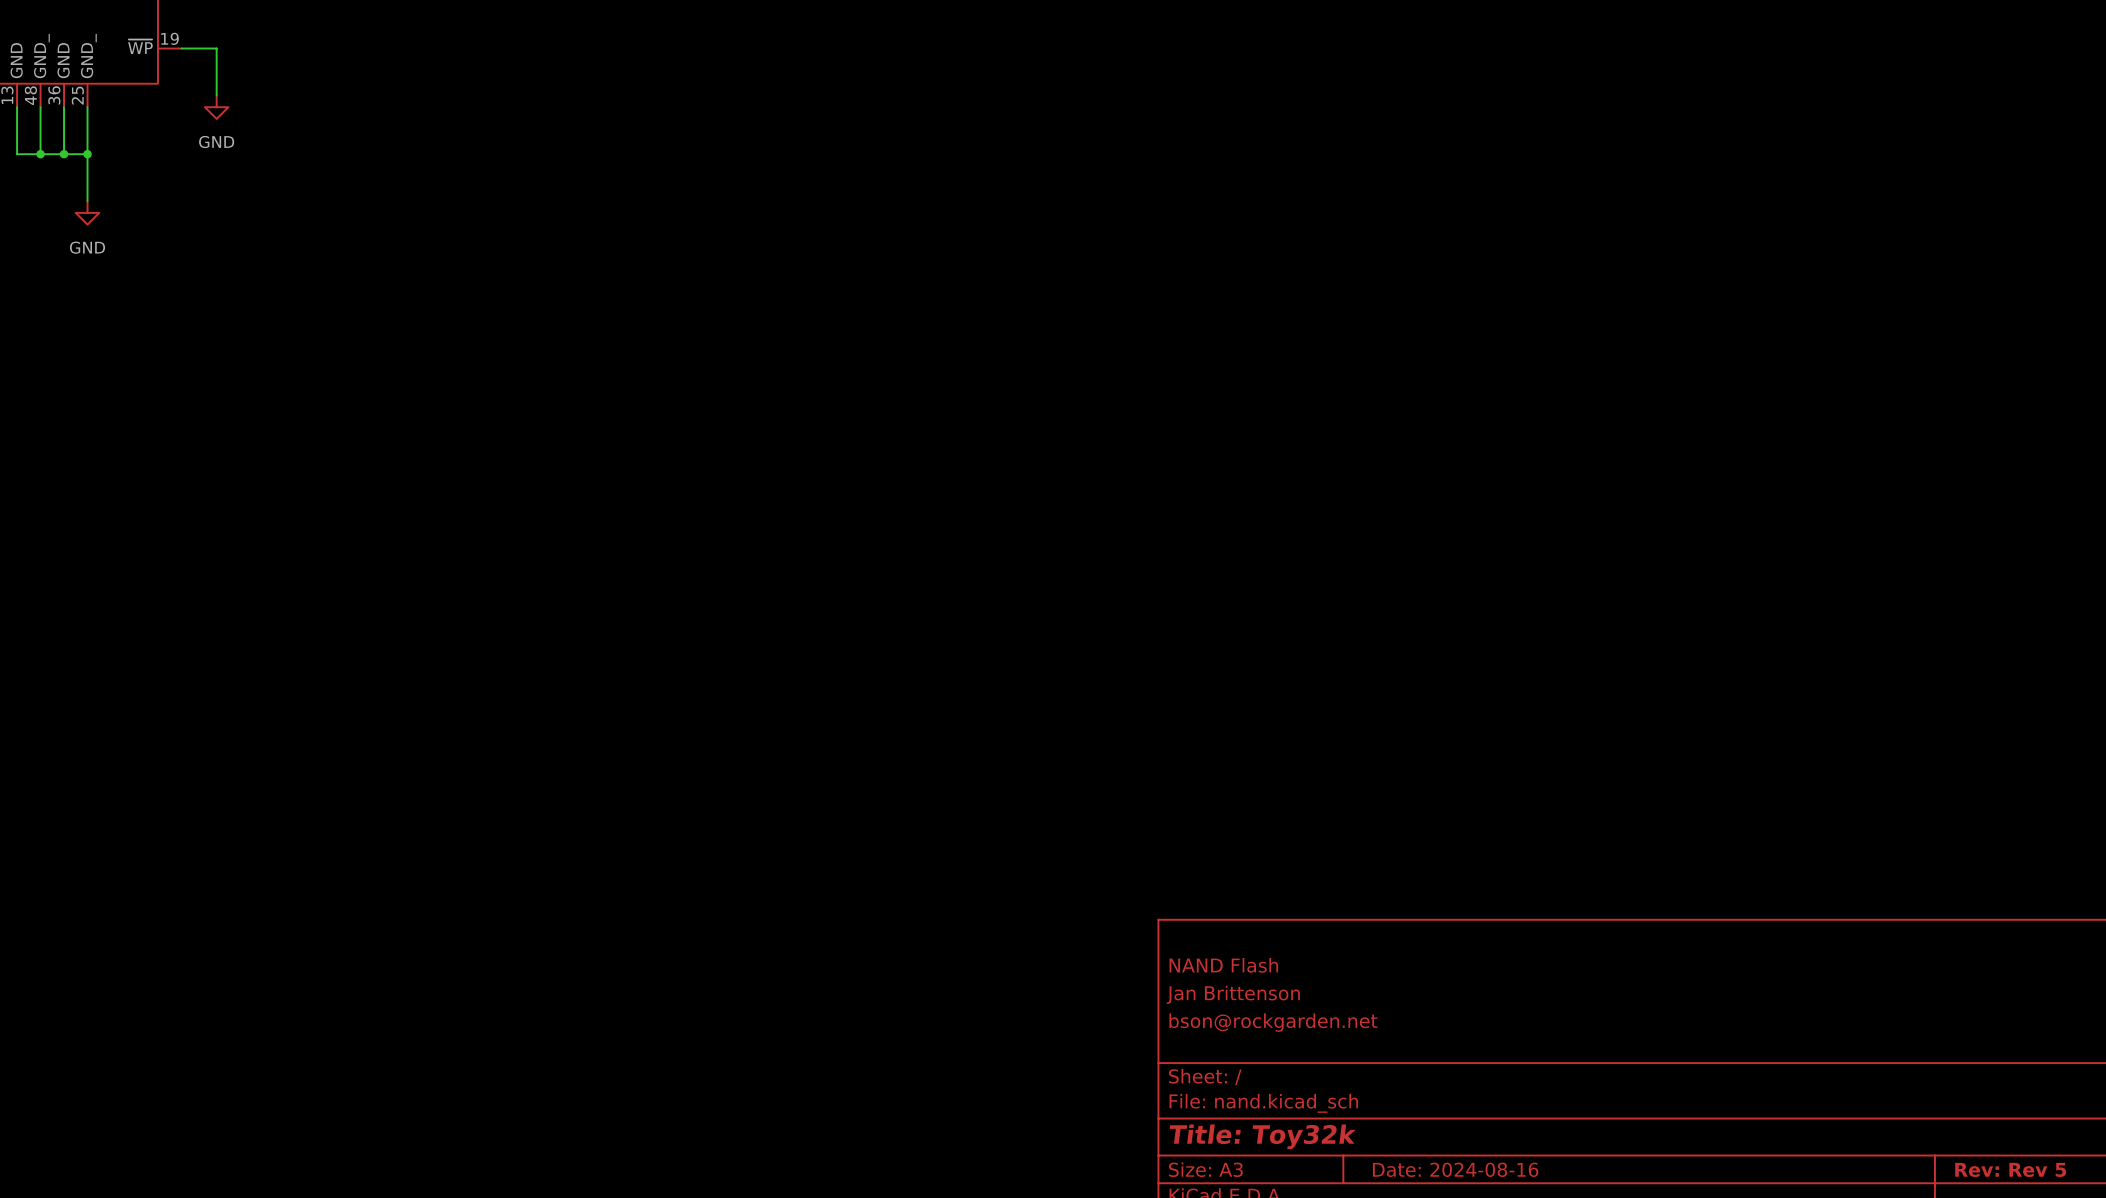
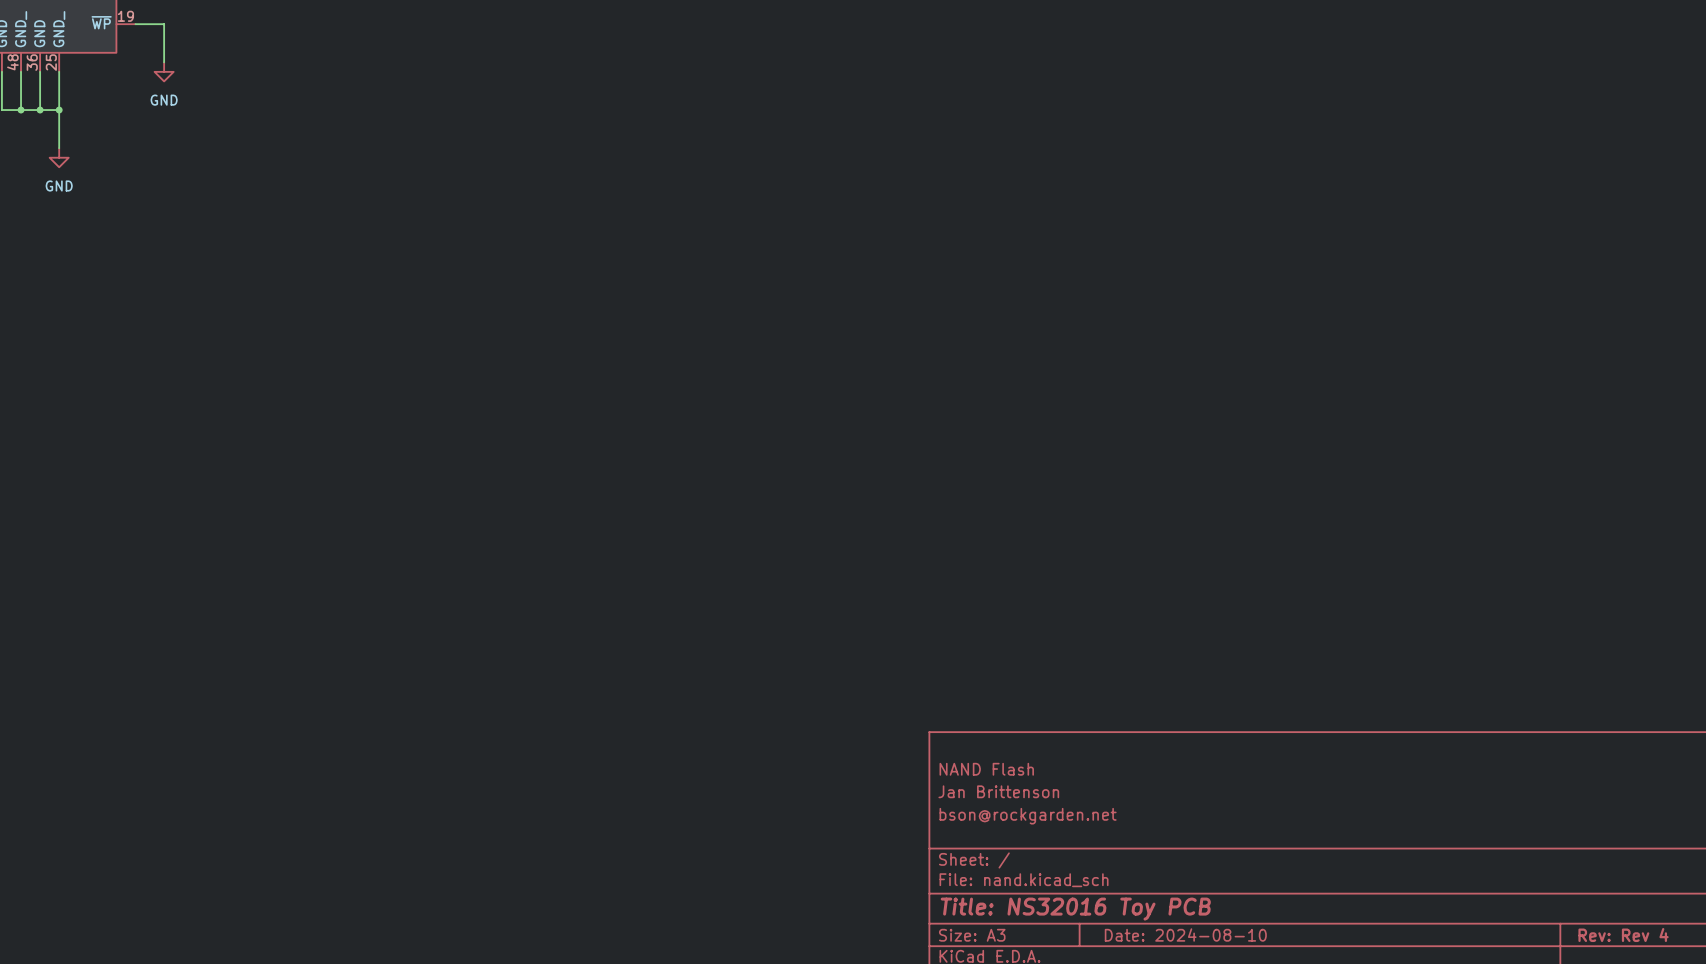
title block: Title: Toy32k (1262, 1136) -> Title: NS32016 Toy PCB (1075, 909)
title block: Date: 2024-08-16 (1455, 1169) -> Date: 2024-08-10 (1185, 935)
title block: Rev: Rev 5 (2010, 1169) -> Rev: Rev 4 (1623, 935)

